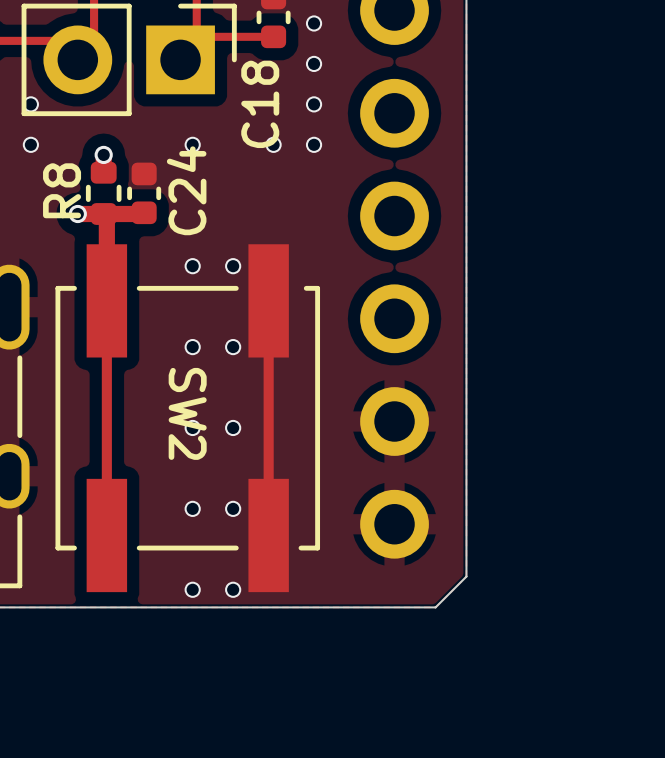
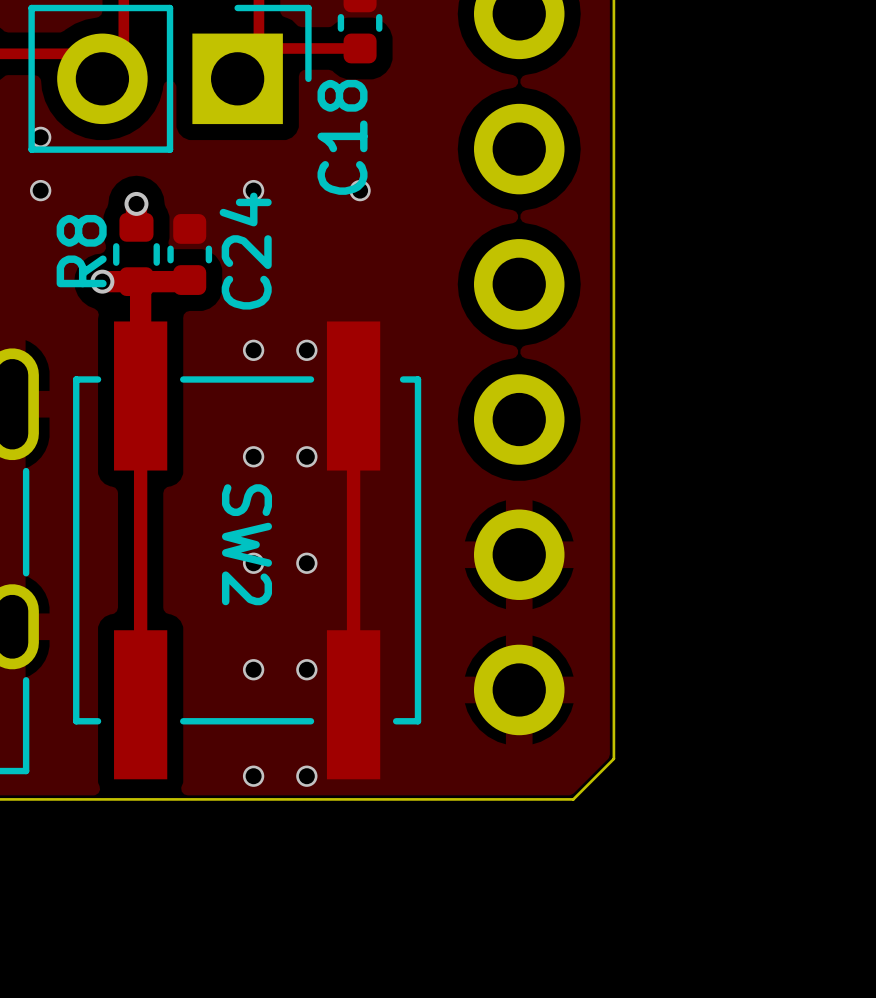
via: (314, 23) -> none
via: (314, 63) -> none
via: (314, 104) -> none
via: (314, 144) -> none

